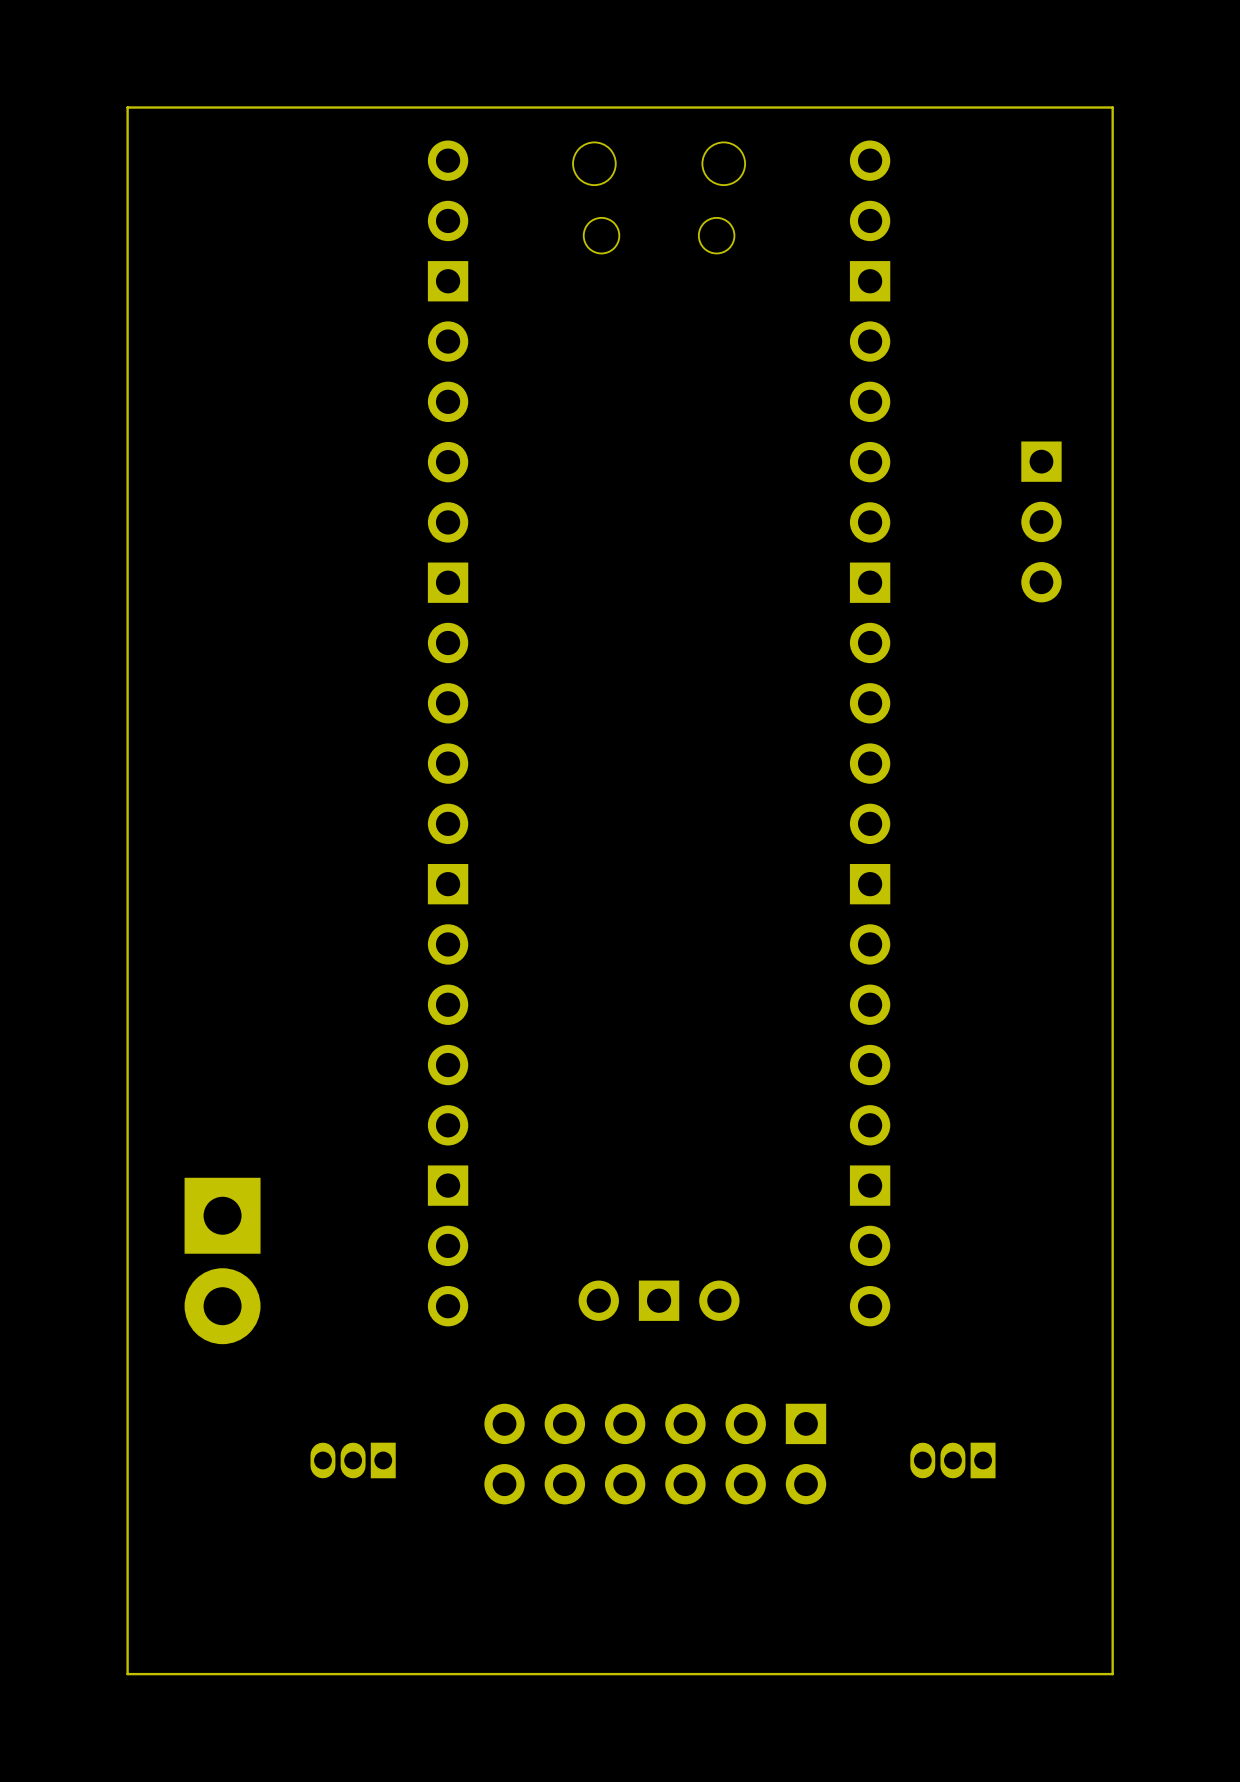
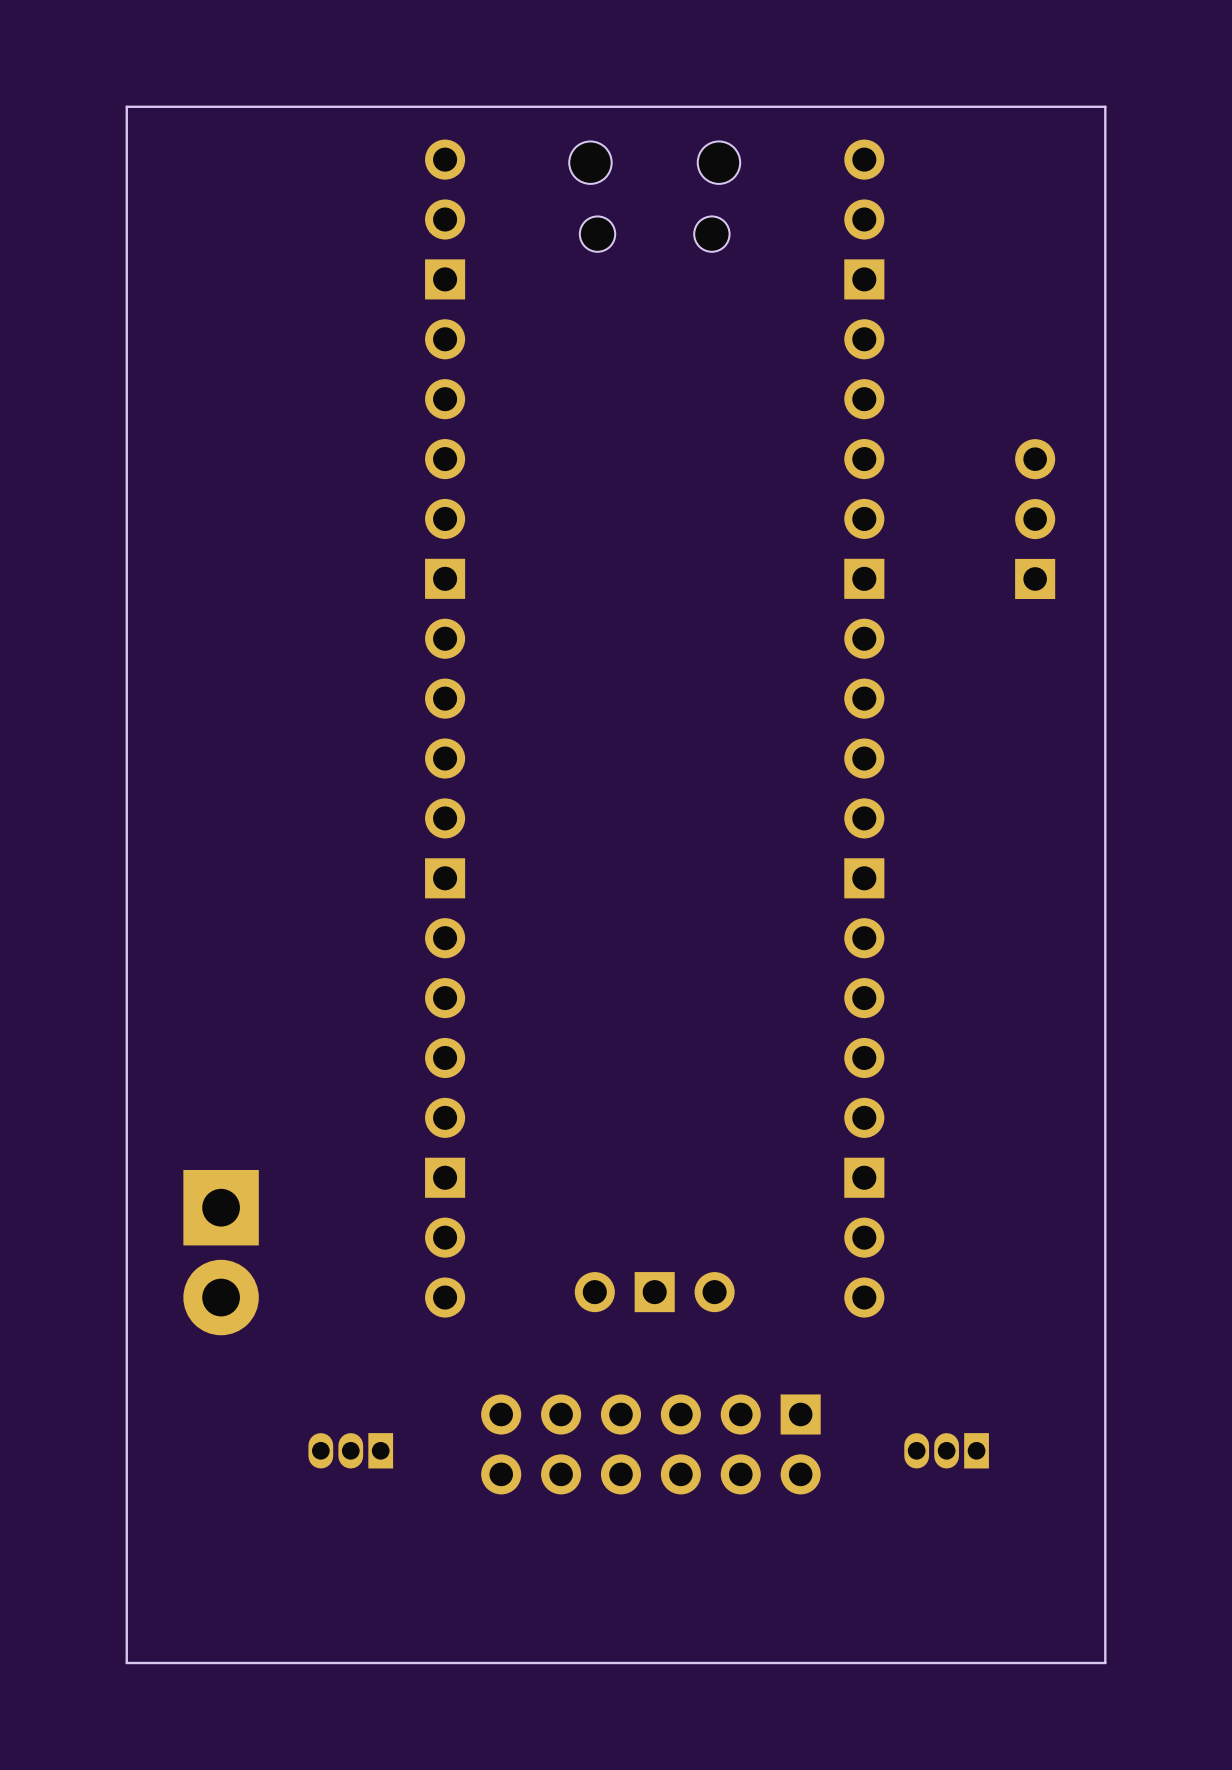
part rotation: 0° (1041, 521) -> 180° (1035, 519)

